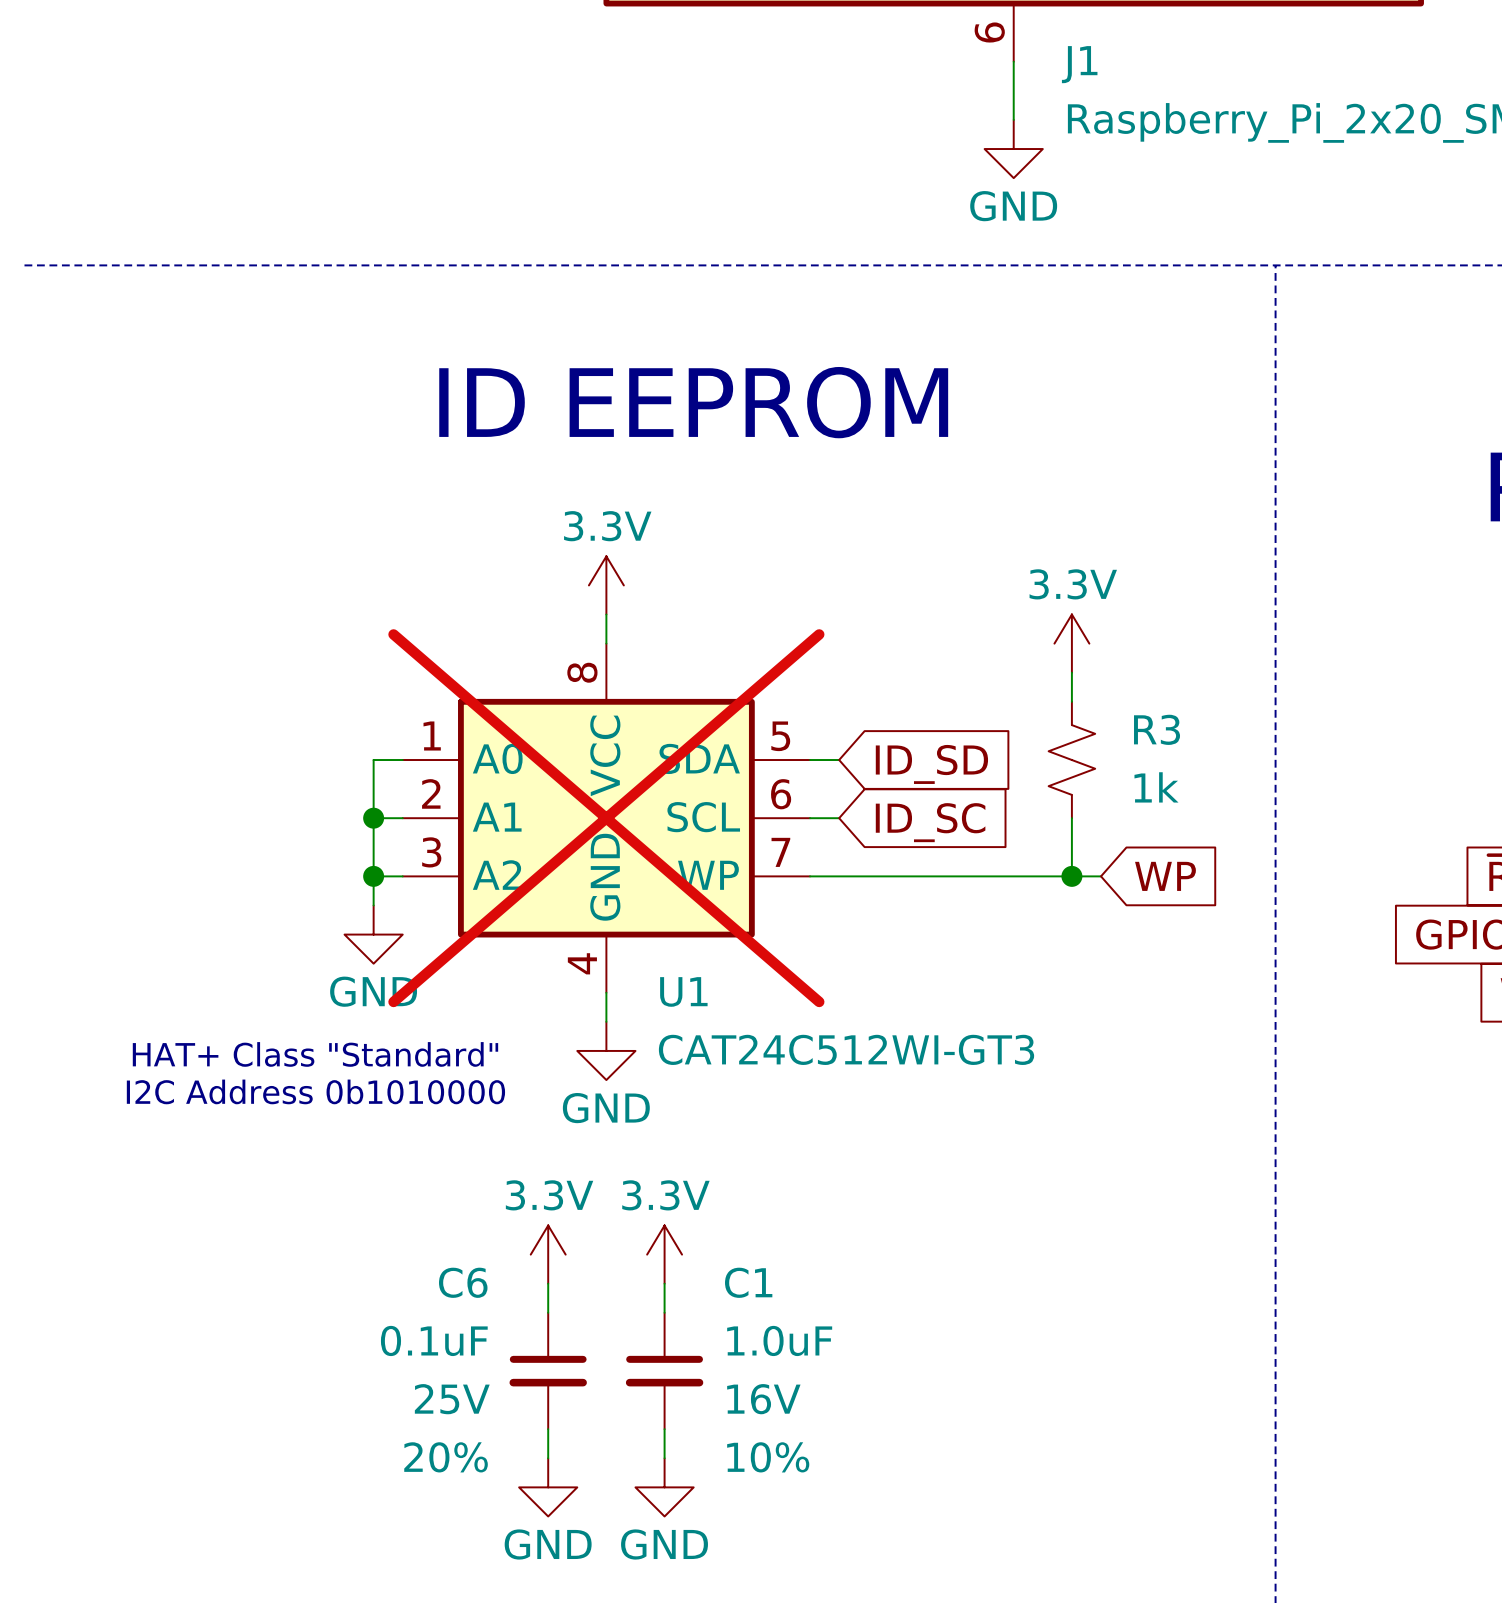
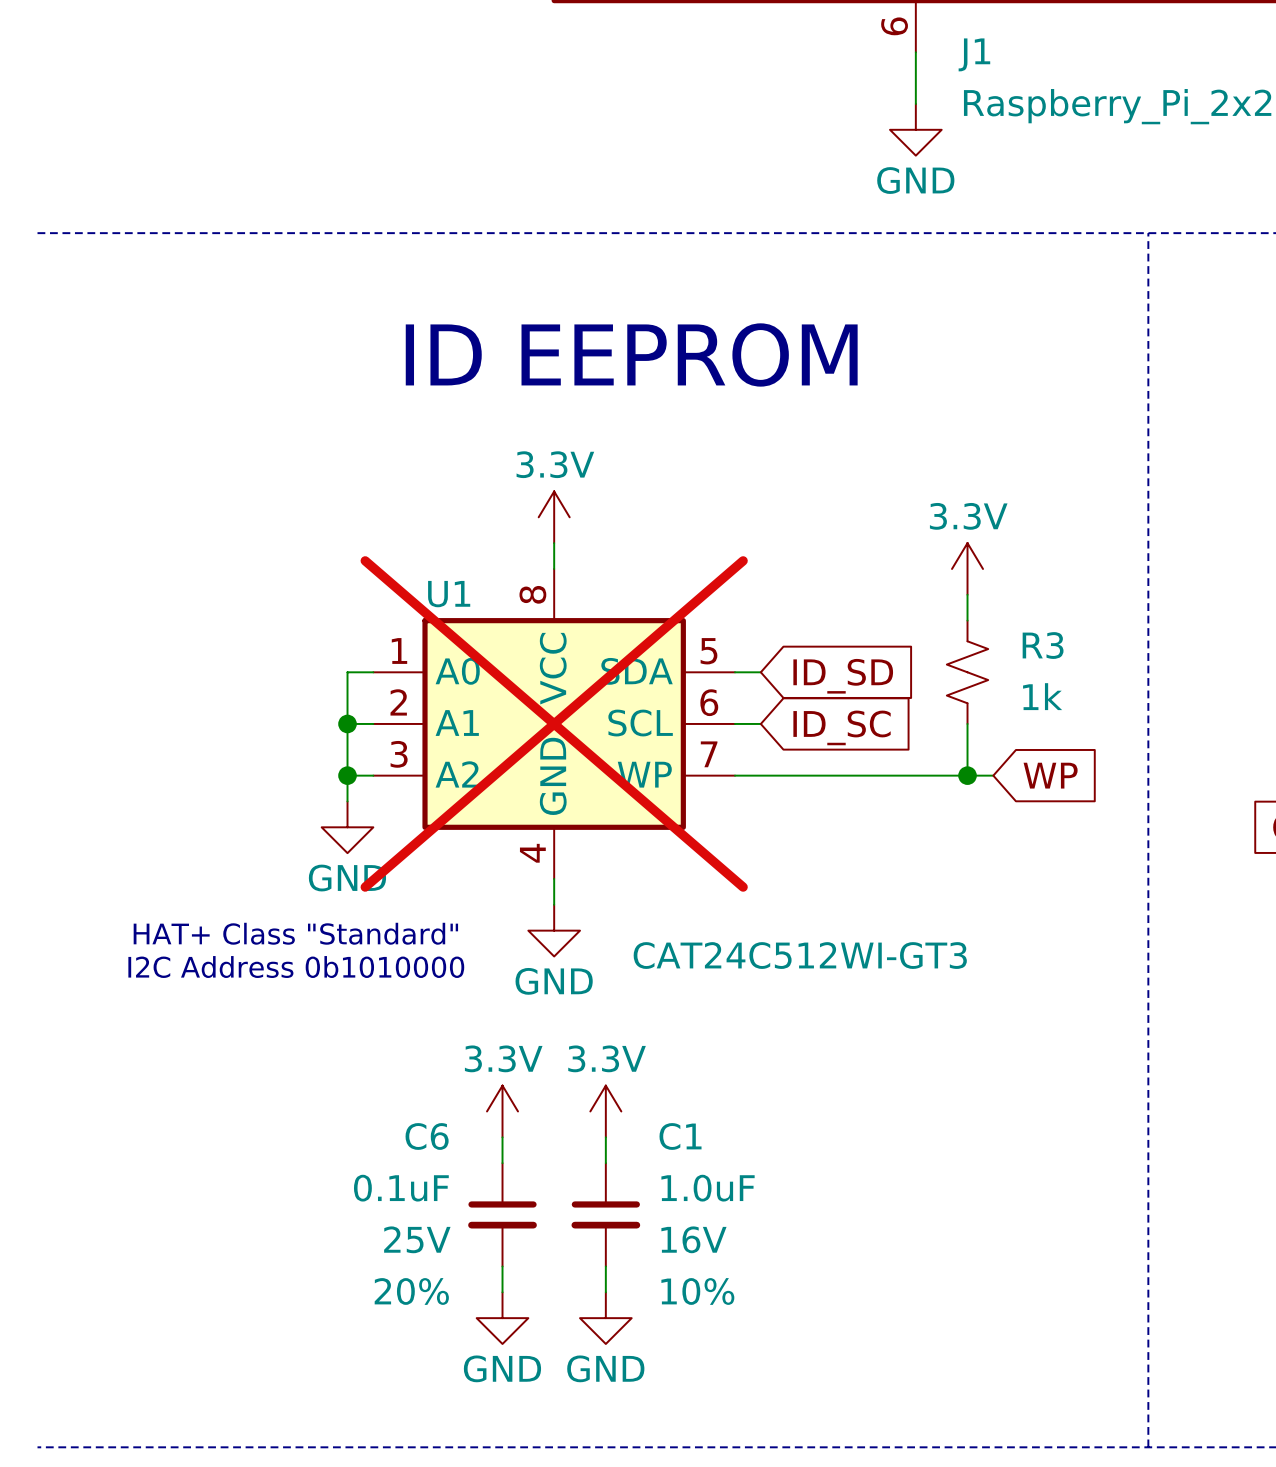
U1 name position: U1 (683, 991) -> U1 (449, 594)
U1 value position: CAT24C512WI-GT3 (846, 1049) -> CAT24C512WI-GT3 (800, 955)

